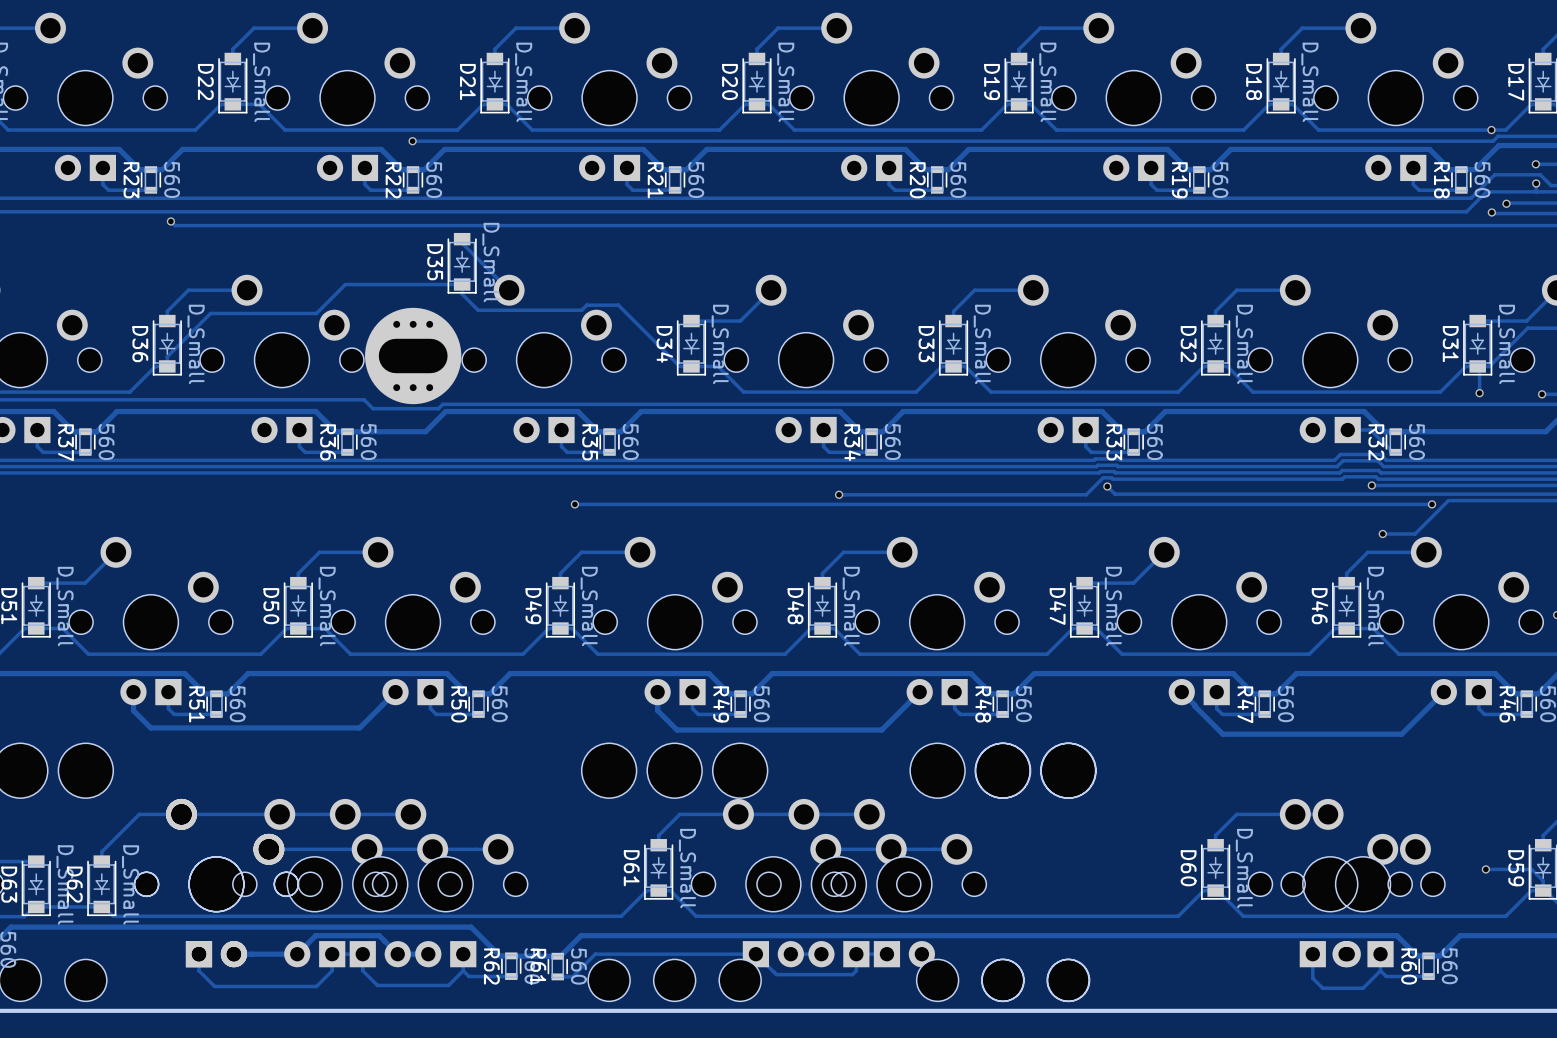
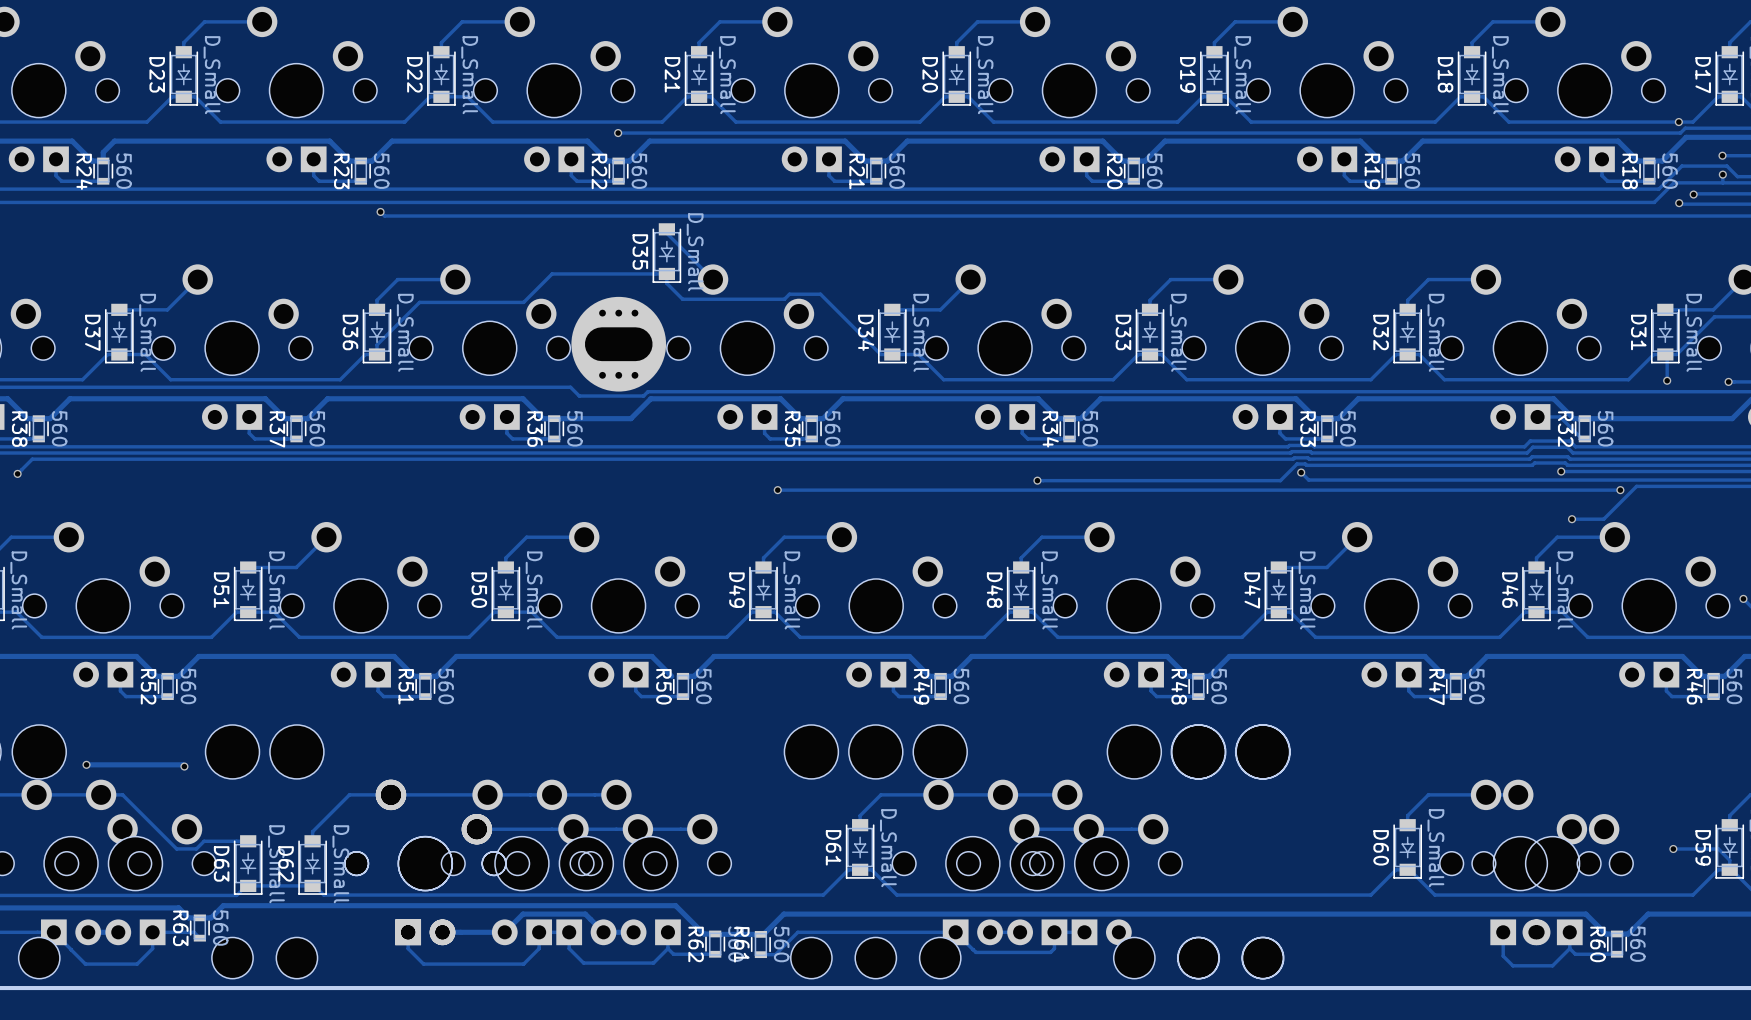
track: (395, 692) (359, 727) (150, 727) (133, 710) (133, 692) -> none
track: (919, 692) (881, 730) (677, 730) (657, 710) (657, 692) -> none
track: (1443, 692) (1401, 734) (1222, 734) (1181, 692) -> none

